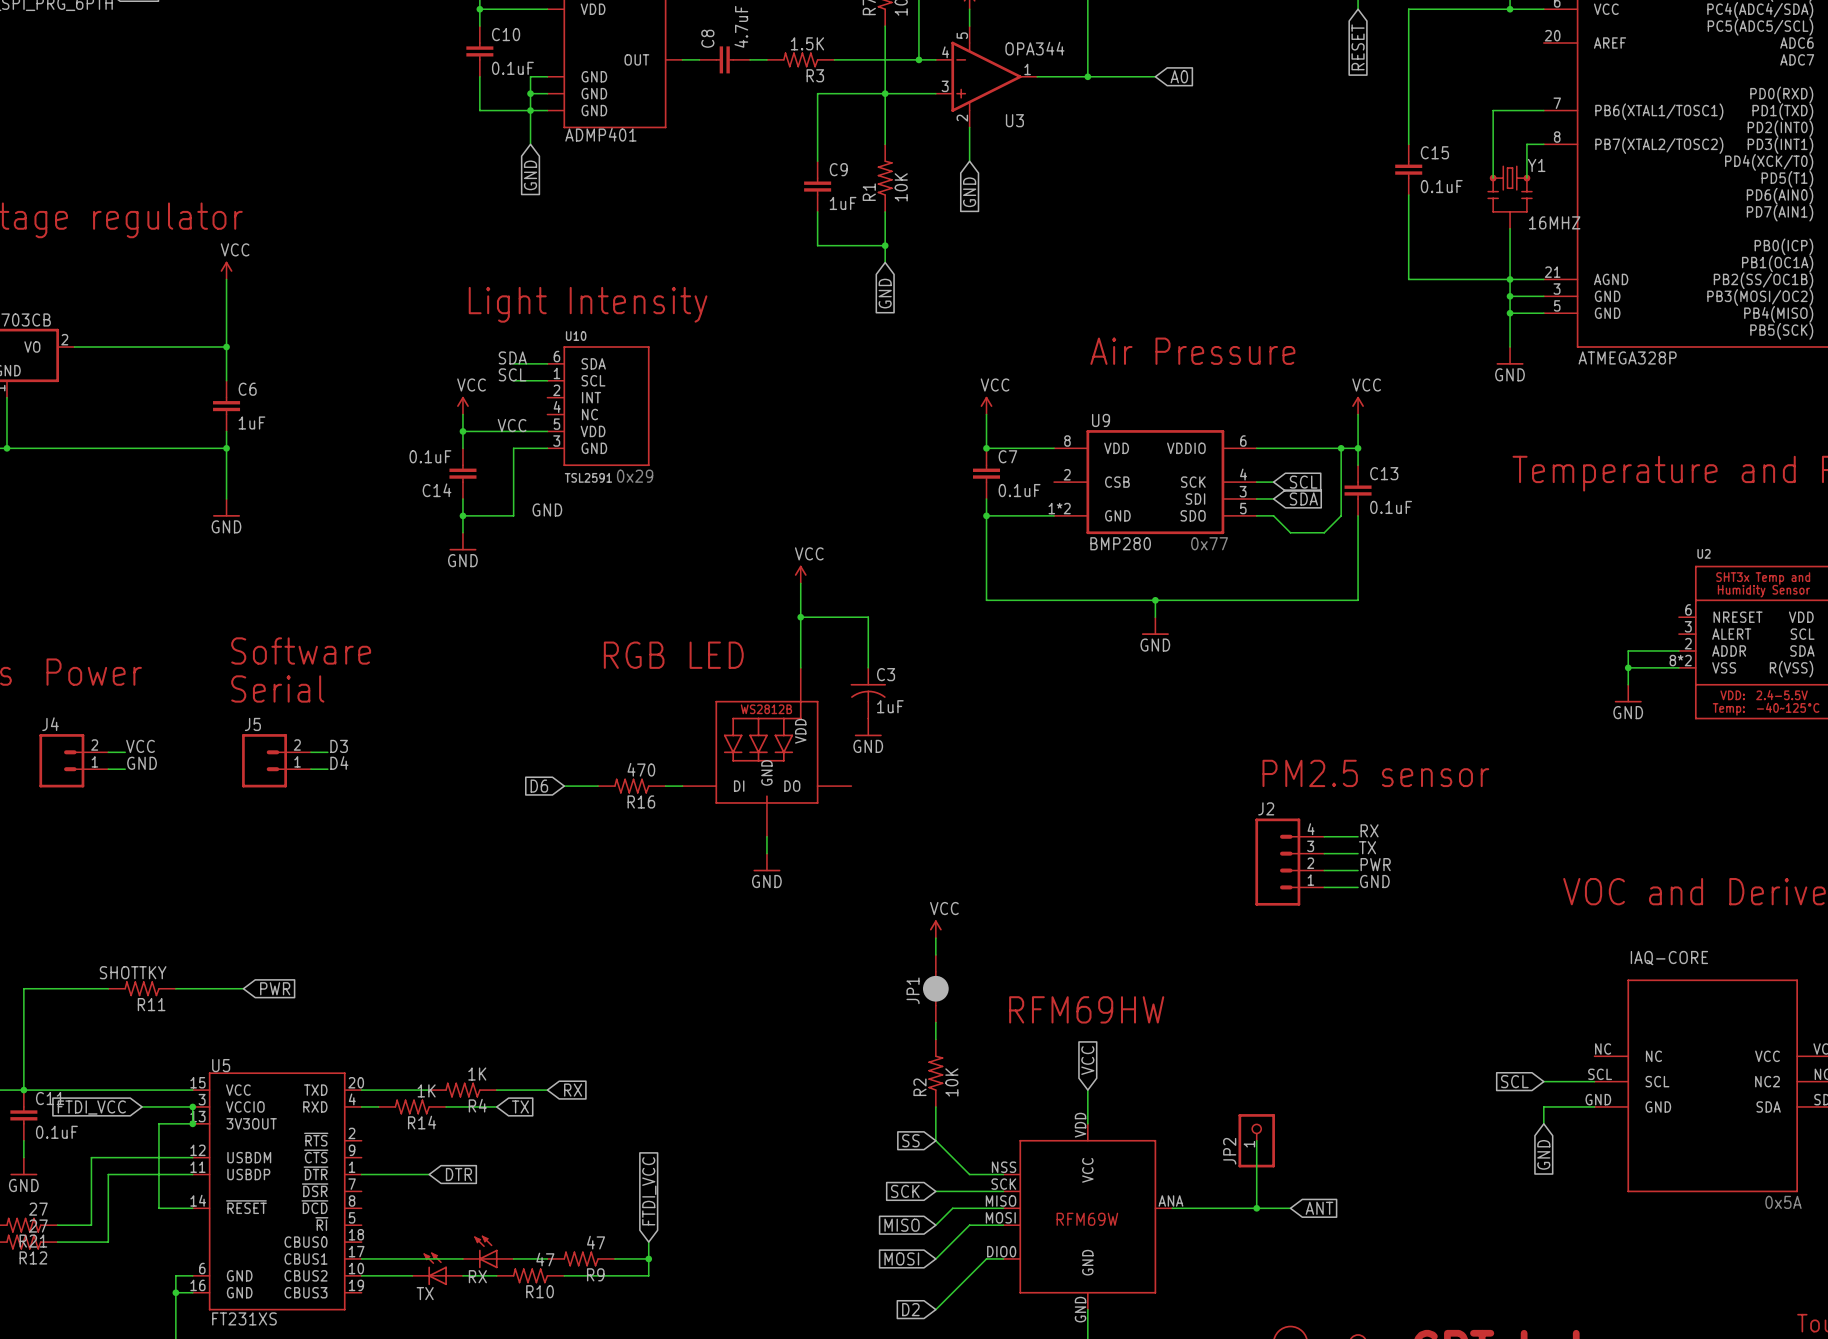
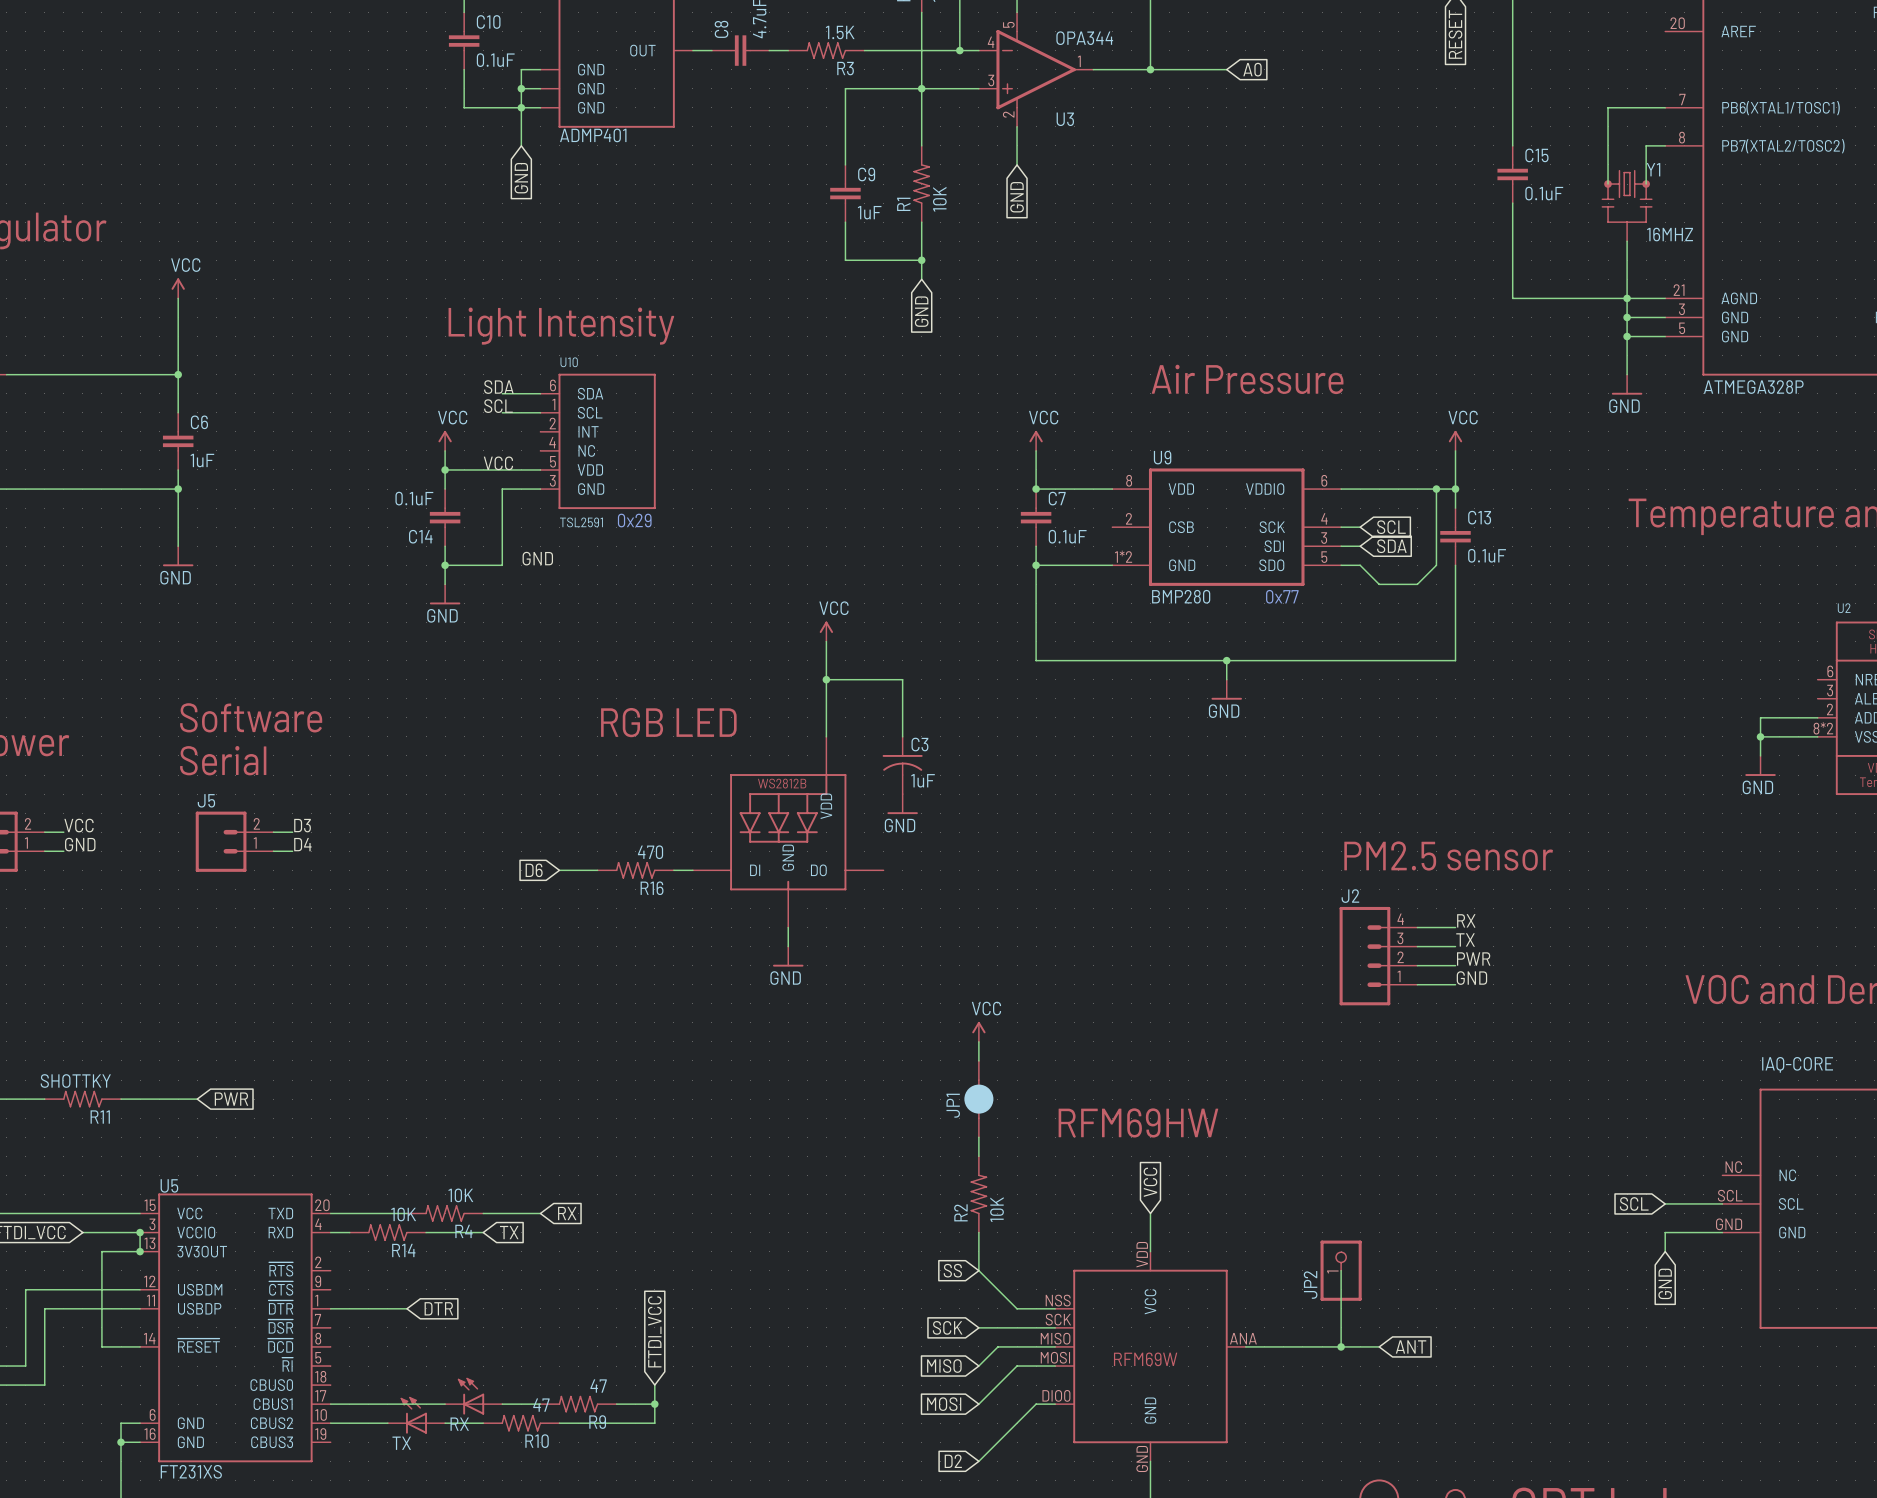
R4 value: 1K (477, 1074) -> 10K (460, 1195)
R14 value: 1K (426, 1090) -> 10K (403, 1214)

